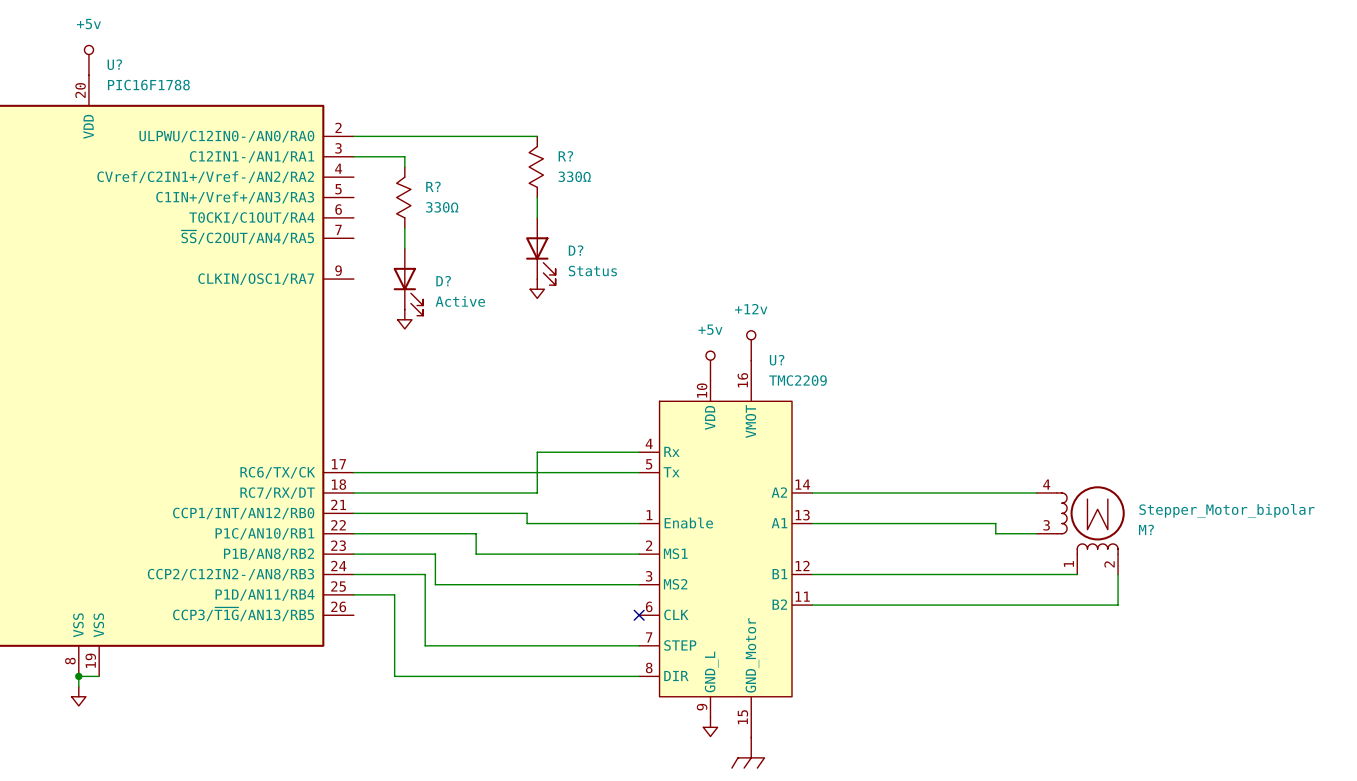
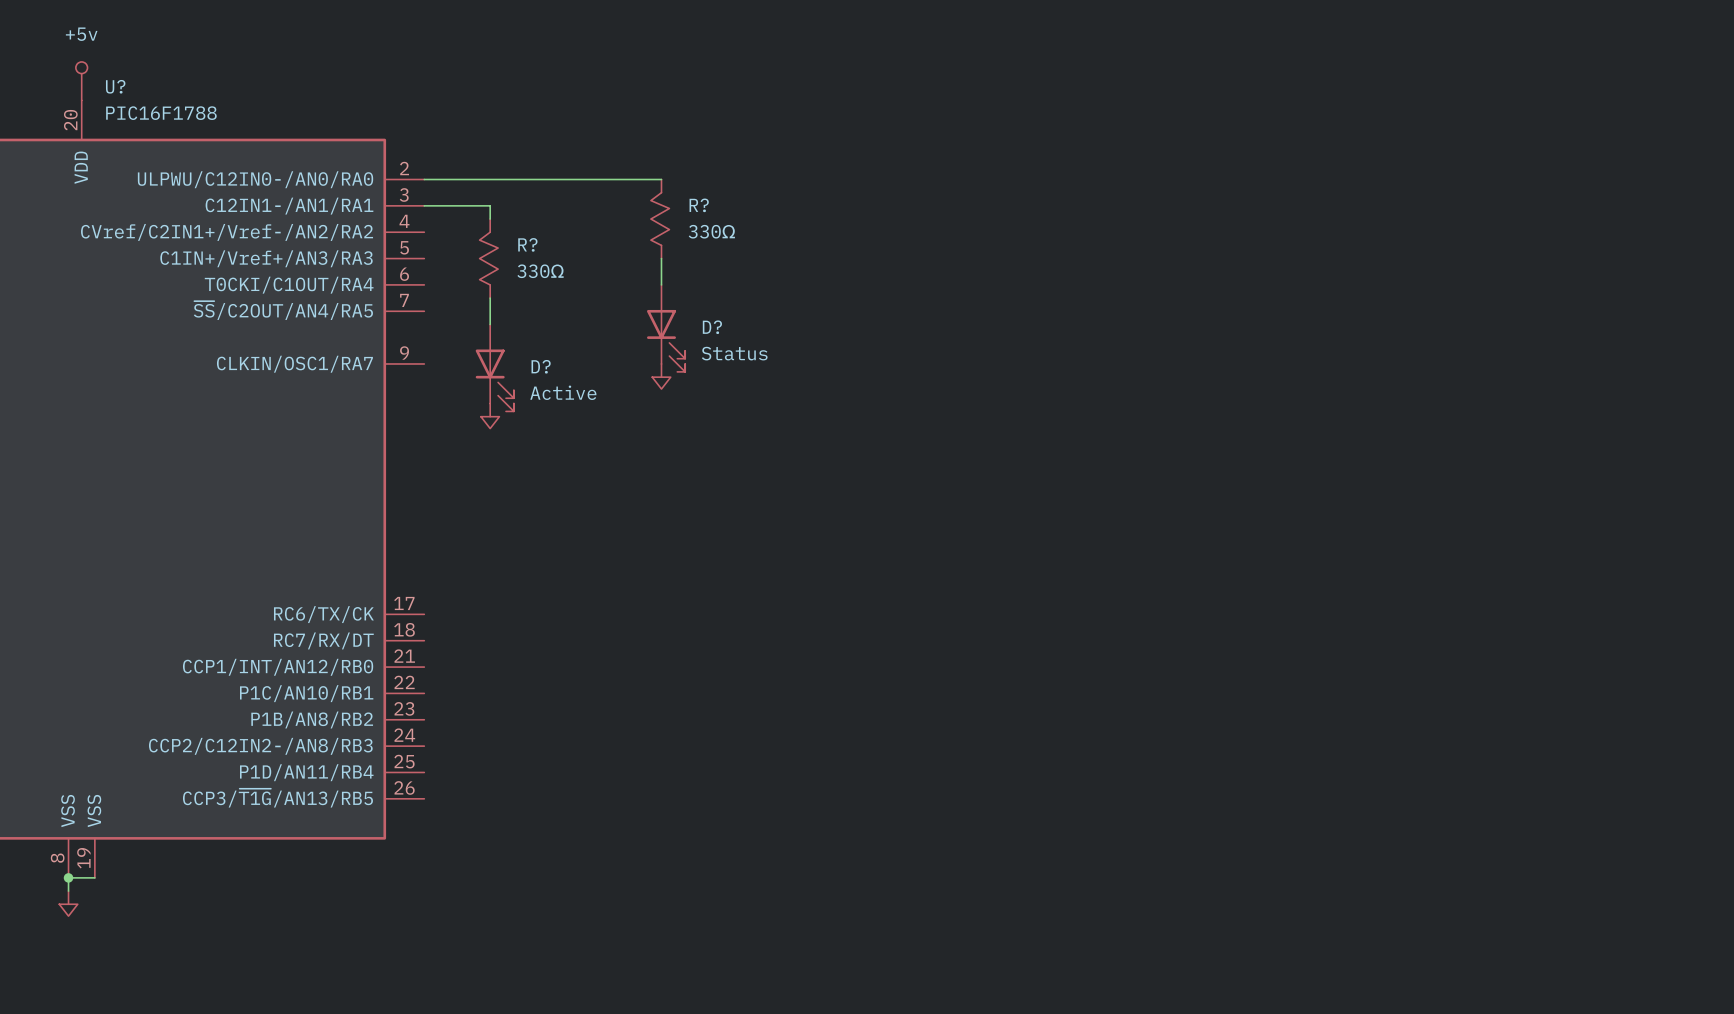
power symbol: +12v (751, 345) -> none
power symbol: +5v (710, 366) -> none
wire: (639, 452) (537, 452) (537, 492) (353, 492) -> none
wire: (353, 472) (639, 472) -> none
wire: (812, 492) (1036, 492) -> none
wire: (353, 513) (527, 513) (527, 523) (639, 523) -> none
wire: (812, 523) (995, 523) (995, 533) (1036, 533) -> none
M?: Stepper_Motor_bipolar (1080, 530) -> none
wire: (353, 533) (476, 533) (476, 554) (639, 554) -> none
U?: TMC2209 (725, 549) -> none
wire: (353, 554) (435, 554) (435, 584) (639, 584) -> none
wire: (353, 574) (425, 574) (425, 645) (639, 645) -> none
wire: (812, 574) (1077, 574) -> none
wire: (1118, 574) (1118, 605) (812, 605) -> none
wire: (353, 594) (394, 594) (394, 676) (639, 676) -> none
no-connect mark: (639, 615) -> none
power symbol: (710, 726) -> none
power symbol: (748, 752) -> none

